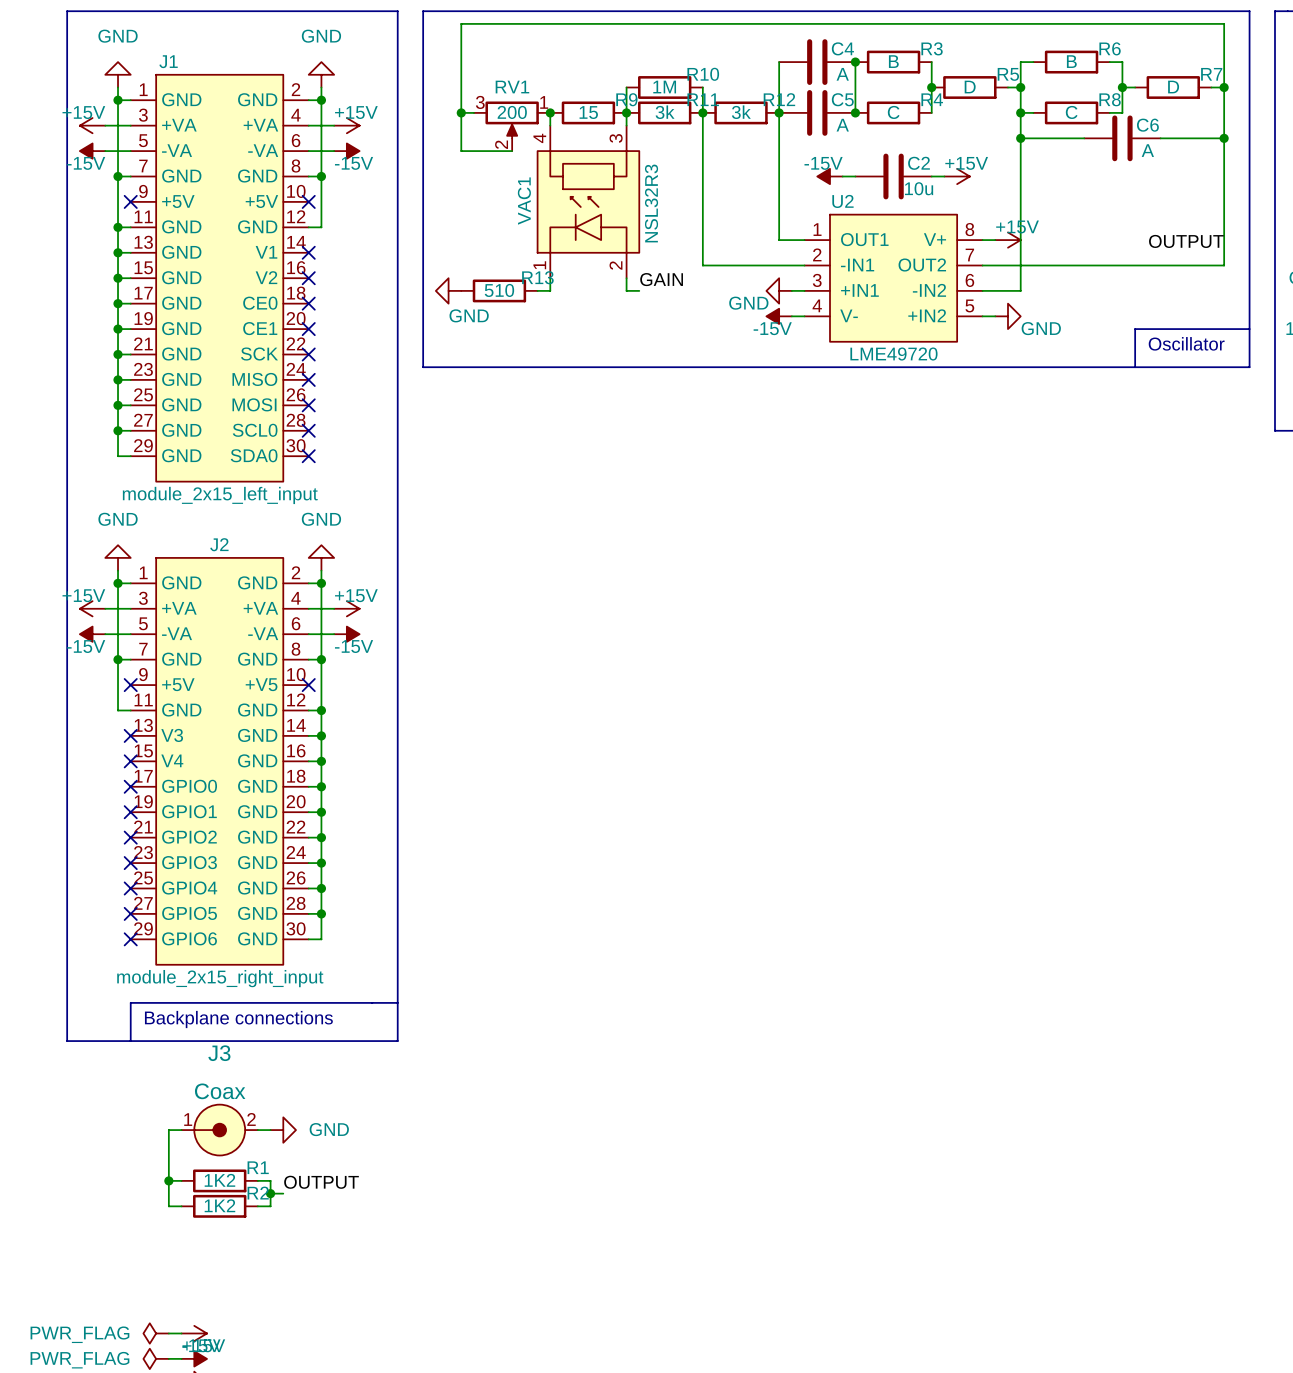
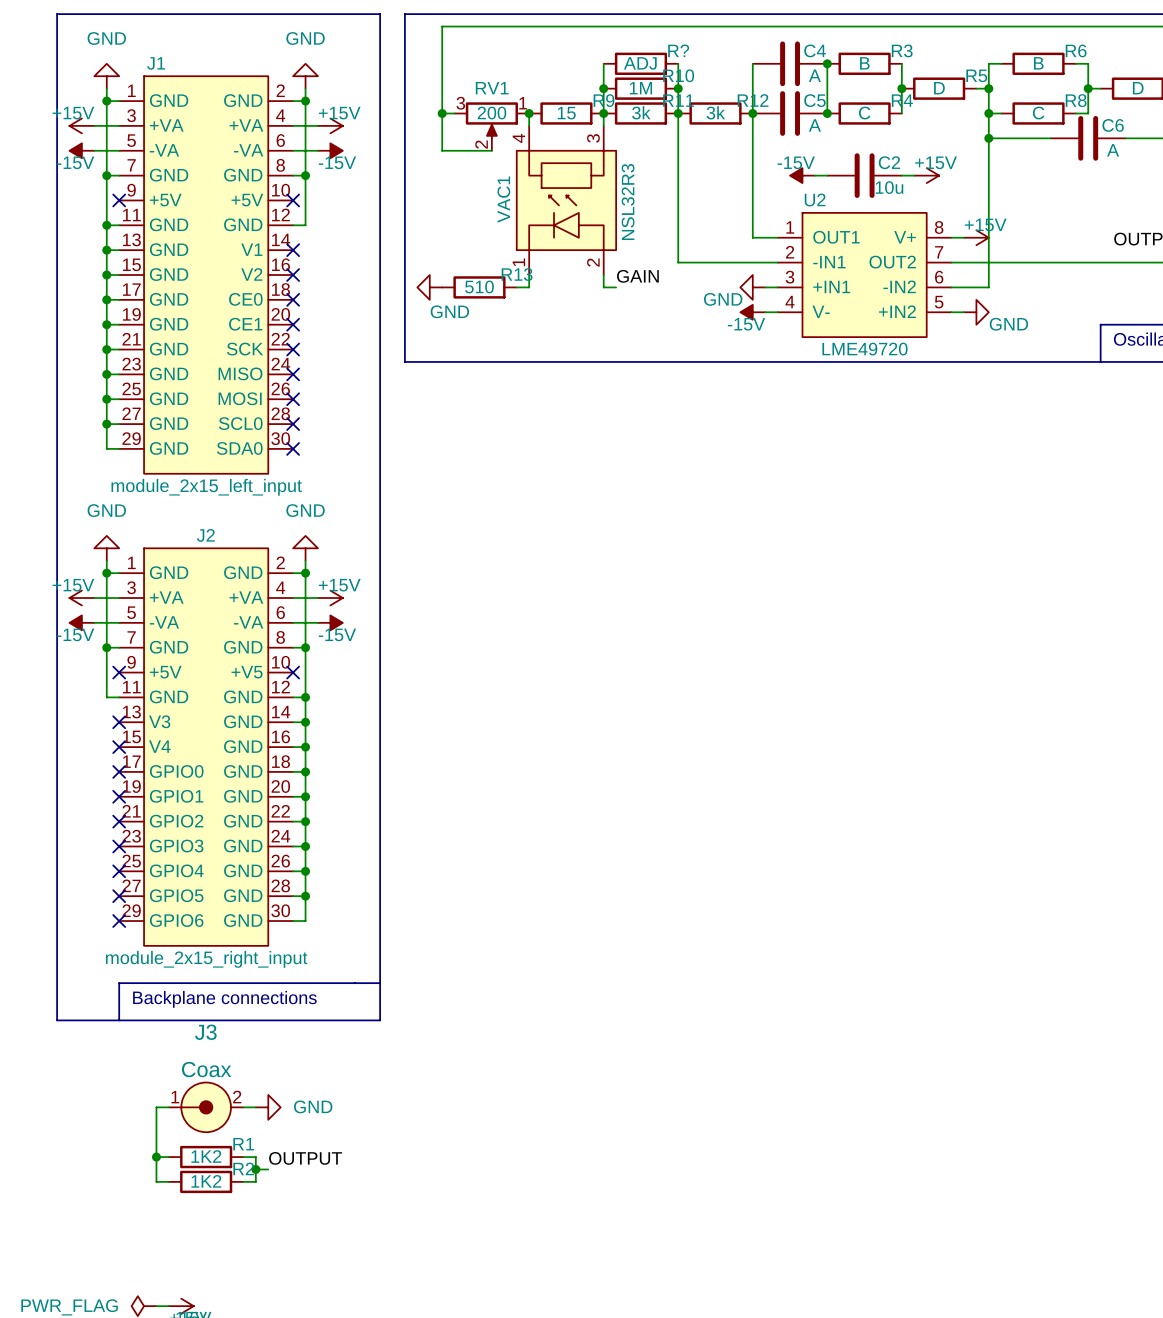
wire: none -> (603, 63) (603, 88)
R?: none -> ADJ (640, 63)
wire: none -> (678, 63) (678, 88)
junction: none -> (603, 88)
junction: none -> (678, 88)

